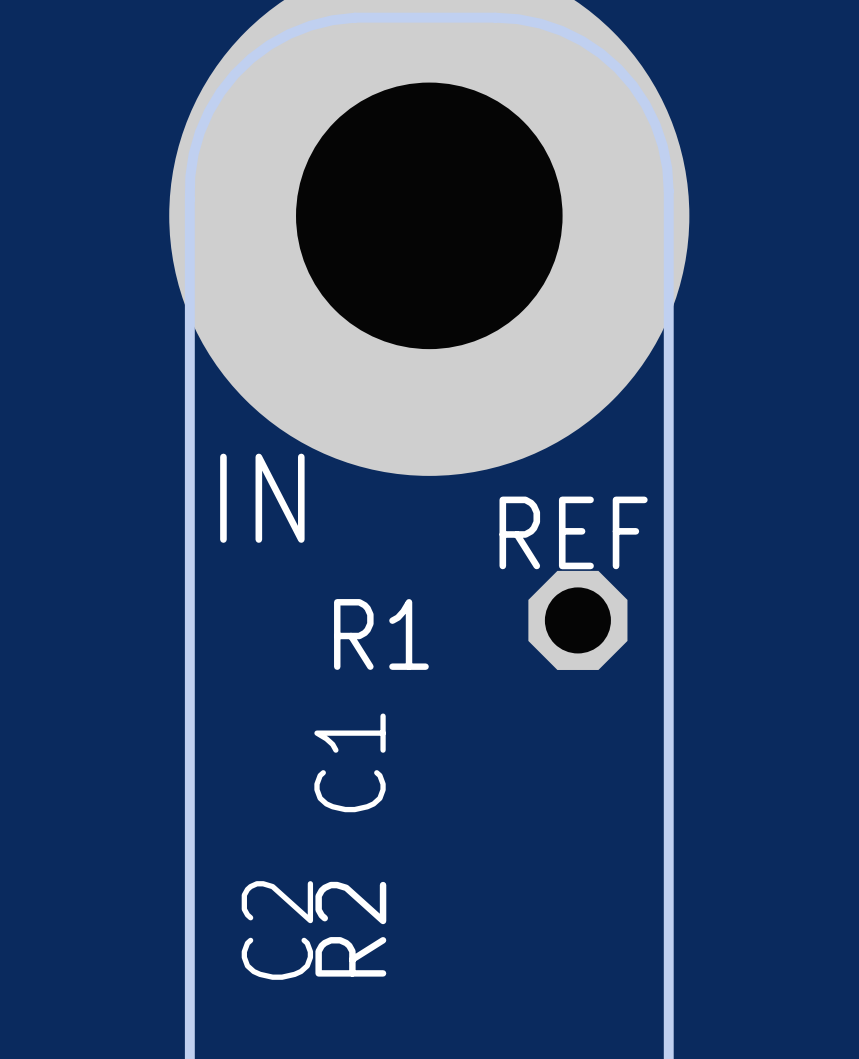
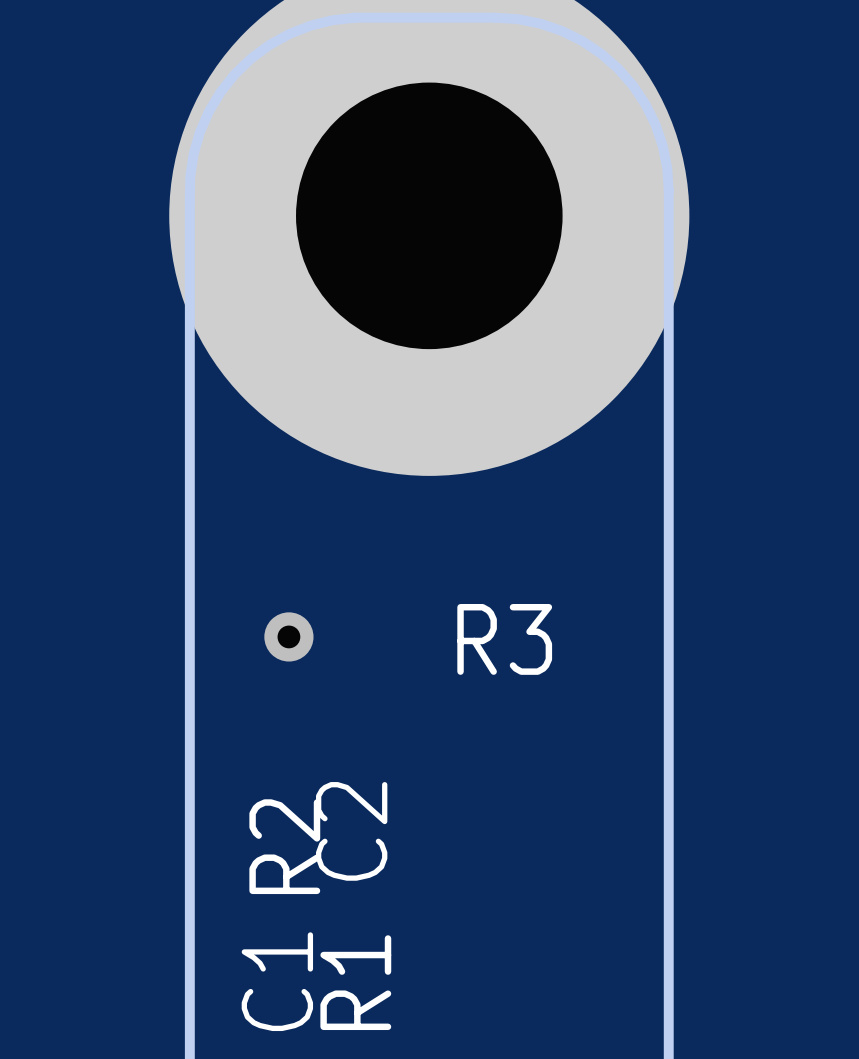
text: IN (262, 498) -> none
REF: (577, 620) -> none
R1 position: (381, 634) -> (355, 982)
R1 name rotation: 0° (381, 634) -> 90° counterclockwise (355, 982)
via: none -> (288, 636)
R3: none -> (504, 639)
C1 position: (350, 762) -> (277, 981)
R2 position: (350, 929) -> (284, 846)
C2 position: (277, 930) -> (351, 831)

